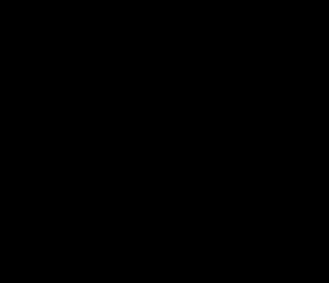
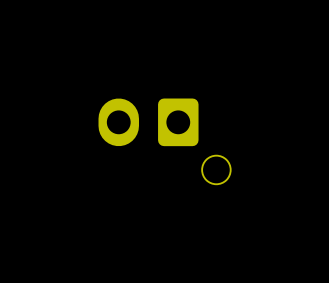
part: none -> (164, 141)

